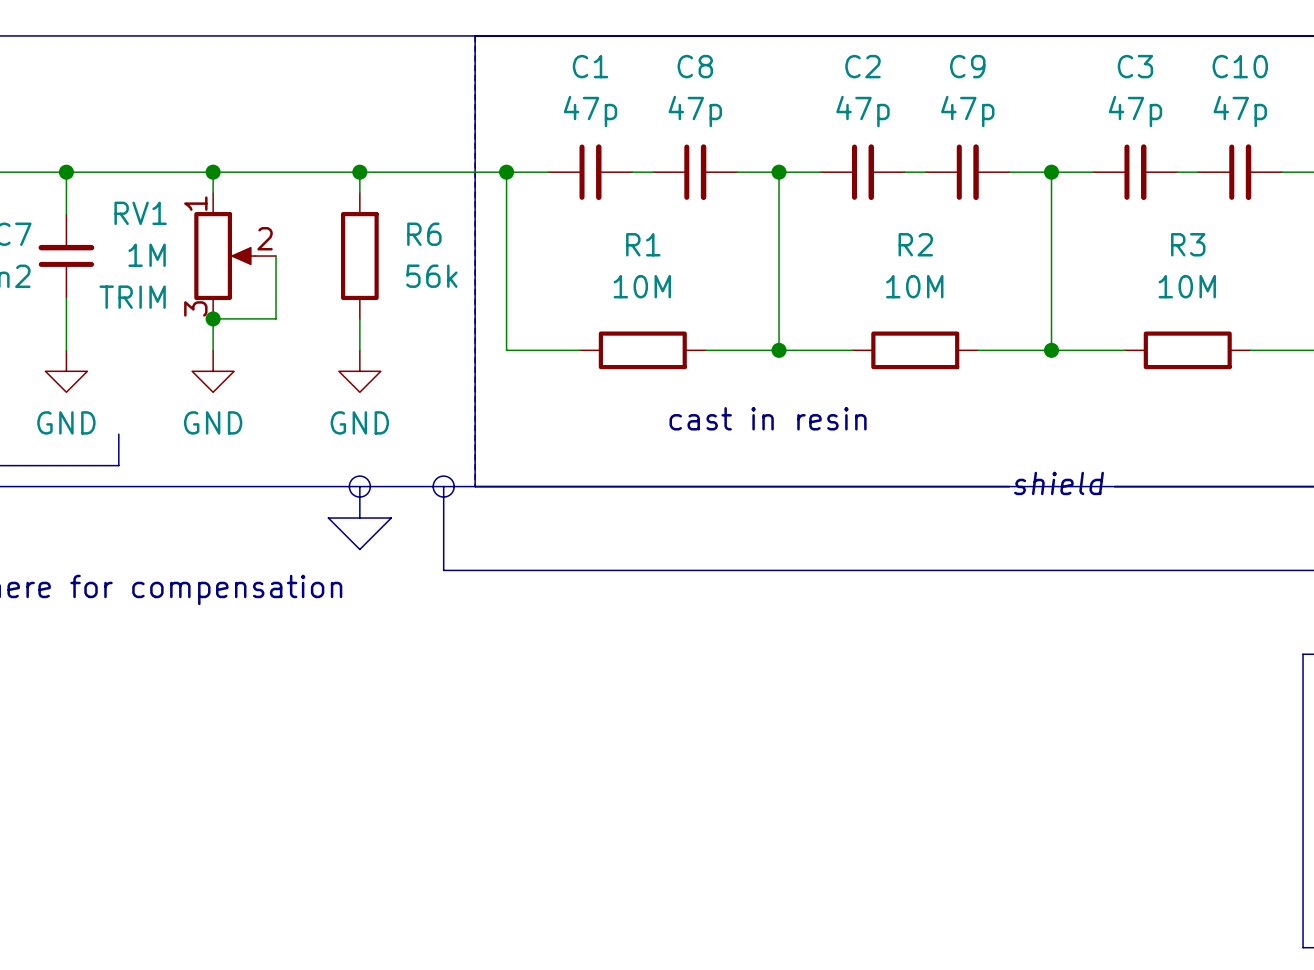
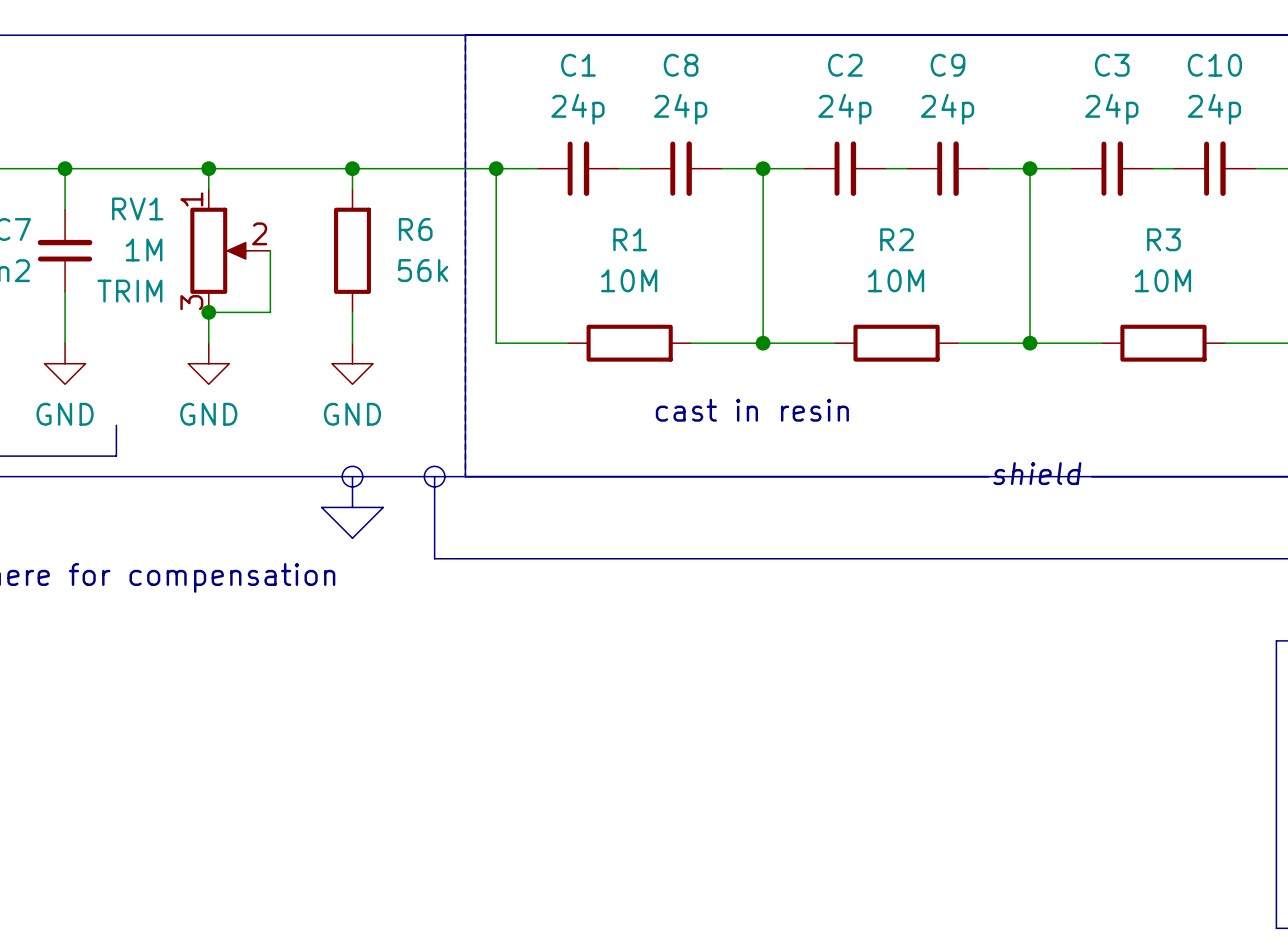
C1 value: 47p (590, 111) -> 24p (577, 109)
C8 value: 47p (695, 111) -> 24p (680, 109)
C2 value: 47p (862, 111) -> 24p (844, 109)
C9 value: 47p (967, 111) -> 24p (947, 109)
C3 value: 47p (1135, 111) -> 24p (1111, 109)
C10 value: 47p (1240, 111) -> 24p (1214, 109)

